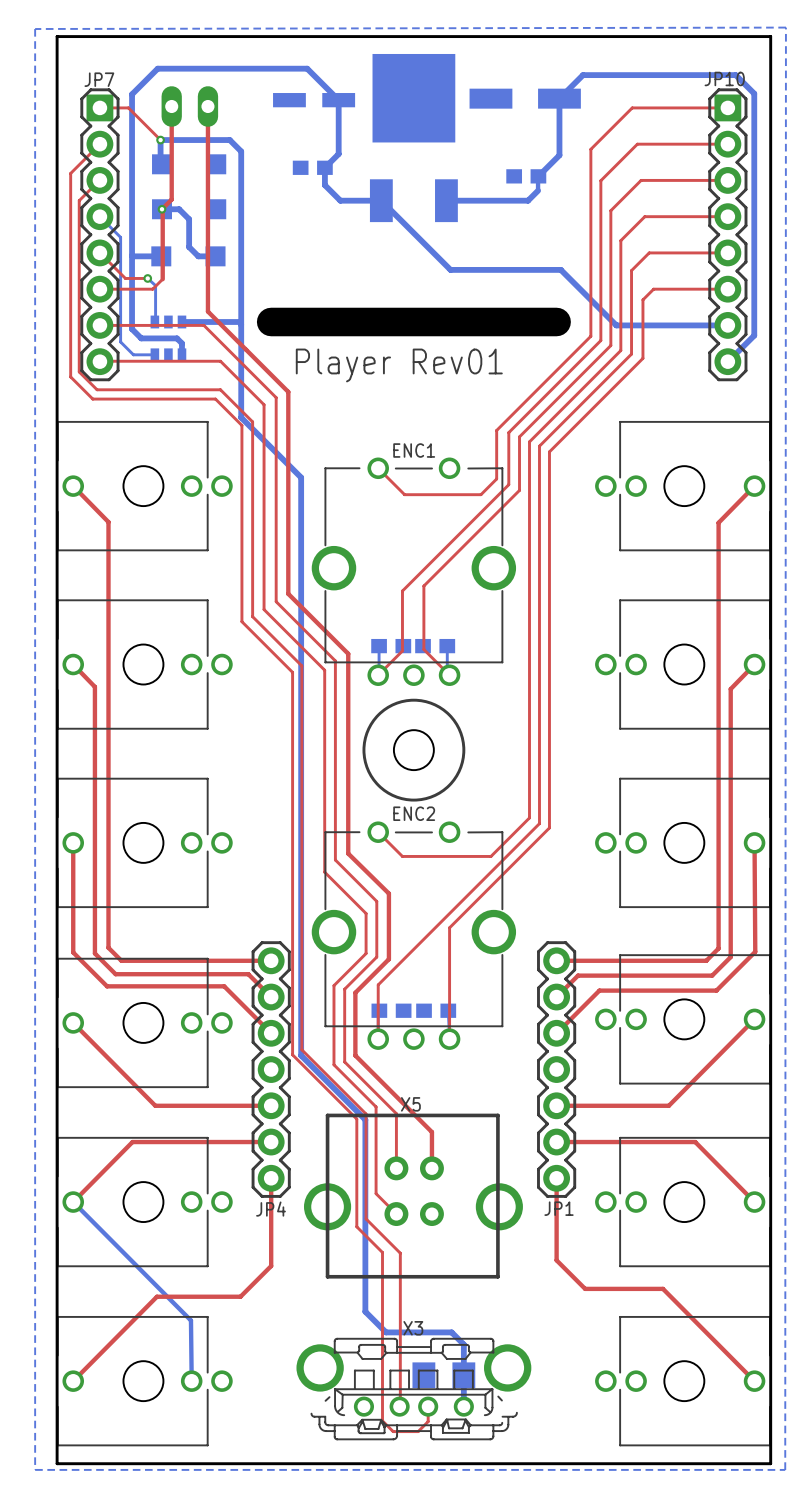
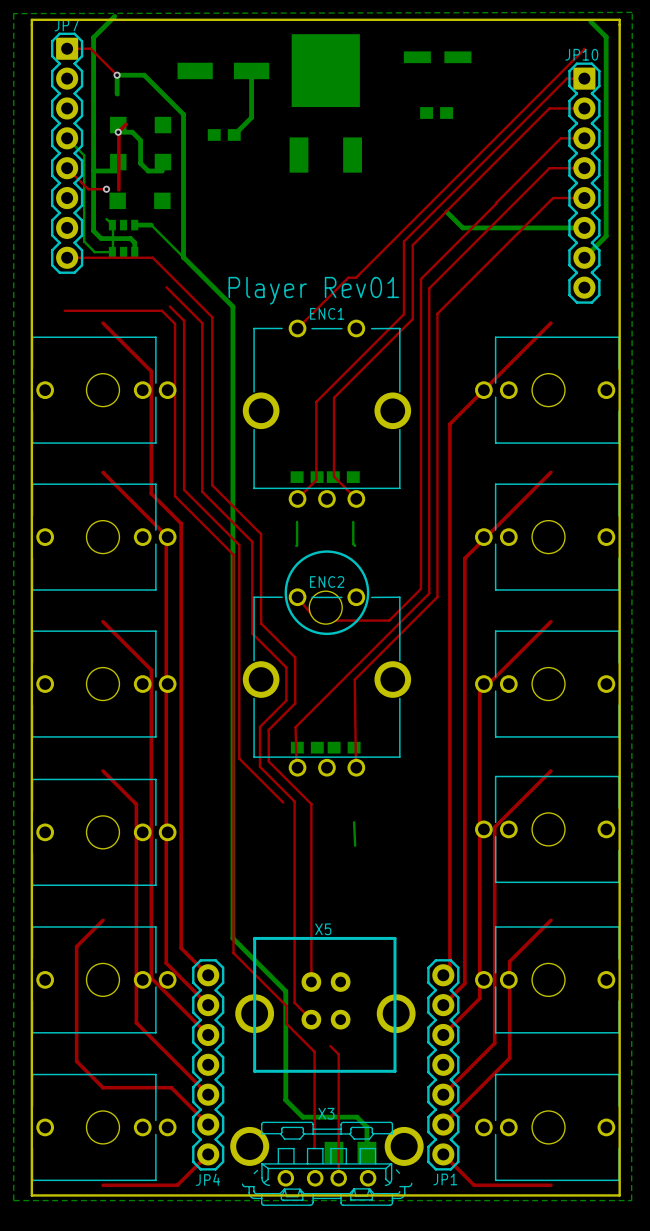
top track: none -> (584, 48) (355, 277) (348, 277) (297, 328)
bottom track: (754, 93) (735, 75) (583, 75) (559, 98) (559, 155) (538, 176) (538, 190) (528, 200) (446, 200) -> (606, 66) (606, 36) (590, 21)
bottom track: (132, 94) (157, 68) (307, 68) (338, 100) (338, 154) (324, 167) (324, 185) (340, 200) (381, 200) (450, 269) (560, 269) -> (93, 67) (93, 37) (114, 16)
bottom track: none -> (251, 70) (251, 117) (233, 135)
part position: (525, 98) -> (223, 70)
part position: (314, 100) -> (437, 57)
via: none -> (117, 75)
top track: (171, 106) (171, 199) (162, 209) -> (126, 124) (118, 132) (118, 162)
part: (189, 106) -> none
top track: (207, 106) (207, 311) (288, 391) (288, 593) (348, 653) (348, 853) (388, 893) (388, 959) (355, 992) (355, 1055) (431, 1132) (431, 1168) -> none
top track: (99, 107) (128, 107) (160, 140) -> (67, 48) (90, 48) (117, 75)
top track: (706, 107) (632, 107) (590, 149) (590, 336) (496, 430) (496, 478) (480, 494) (404, 494) (378, 468) -> (566, 78) (403, 241) (403, 314) (316, 401) (316, 476)
via: (160, 140) -> none
bottom track: (229, 140) (160, 140) (162, 164) -> (174, 105) (144, 75) (117, 75) (118, 95)
top track: (99, 144) (70, 173) (70, 376) (92, 399) (215, 399) (241, 425) -> (169, 306) (184, 320) (184, 340)
top track: (685, 144) (637, 144) (600, 180) (600, 340) (508, 432) (508, 484) (402, 591) -> (549, 108) (412, 245) (412, 319) (333, 397) (333, 472)
part position: (312, 167) -> (224, 134)
via: none -> (118, 132)
part position: (526, 176) -> (436, 112)
top track: (99, 180) (79, 200) (79, 371) (97, 389) -> none
top track: (699, 180) (641, 180) (610, 210) (610, 345) (519, 436) (519, 490) (423, 586) -> (560, 138) (496, 202)
bottom track: (162, 209) (179, 209) (189, 219) (189, 247) (198, 256) (215, 256) -> (118, 132) (132, 132) (140, 140) (140, 163) (148, 171) (162, 171)
via: (162, 209) -> none
bottom track: (99, 216) (120, 237) -> (67, 138) (84, 155) (84, 185)
top track: (685, 216) (644, 216) (620, 240) (620, 258) -> (549, 168) (519, 198)
JP7 position: (99, 234) -> (67, 153)
via: none -> (106, 189)
top track: (162, 242) (162, 279) (152, 289) (99, 289) -> none
top track: (99, 252) (125, 278) (147, 278) -> (67, 168) (88, 189) (106, 189)
top track: (649, 252) (689, 252) -> (523, 227) (553, 198)
bottom track: (132, 255) (161, 256) -> (93, 170) (117, 171)
top track: (620, 259) (620, 350) (529, 441) -> (496, 203) (420, 279) (420, 353)
top track: (631, 270) (631, 354) (539, 446) -> (505, 212) (429, 288) (429, 357)
via: (147, 278) -> none
bottom track: (580, 289) (616, 325) (727, 325) -> (462, 227) (584, 227)
top track: (653, 289) (727, 289) -> none
bottom track: (132, 292) (132, 329) (141, 338) (176, 338) (181, 343) (181, 354) -> (93, 230) (101, 238) (130, 238) (134, 242) (134, 252)
top track: (642, 299) (642, 358) (549, 451) -> (514, 236) (437, 313) (437, 361)
bottom track: (754, 299) (754, 335) (728, 361) -> (606, 236) (584, 257)
bottom track: (120, 305) (120, 341) (133, 354) (154, 354) -> (84, 241) (94, 252) (112, 252)
bottom track: (181, 322) (238, 322) -> (134, 225) (151, 225) (181, 254)
board edge: (271, 322) (556, 322) -> none
bottom track: (241, 324) (241, 417) (301, 477) -> (183, 257) (232, 306) (232, 383)
part position: (168, 338) -> (123, 238)
top track: (220, 361) (99, 361) -> none
top track: (215, 389) (220, 389) (252, 421) (252, 616) (301, 665) (301, 685) -> (161, 310) (175, 323) (175, 496) (233, 554)
top track: none -> (102, 323) (151, 371) (151, 493) (181, 523) (181, 948) (208, 975)
top track: none -> (550, 323) (449, 424) (449, 968) (443, 975)
top track: (72, 486) (108, 522) (108, 947) (121, 960) (271, 960) -> none
top track: (754, 486) (718, 522) (718, 948) (706, 960) (556, 960) -> none
ENC1 position: (413, 571) -> (326, 413)
top track: none -> (102, 472) (166, 535) (166, 963) (208, 1005)
top track: none -> (550, 472) (464, 558) (464, 983) (443, 1005)
part: none -> (307, 477)
top track: (423, 591) (423, 649) (449, 675) -> (333, 476) (356, 498)
part: none -> (343, 477)
top track: (402, 595) (402, 650) (378, 675) -> (316, 480) (297, 498)
top track: (241, 607) (241, 621) (292, 672) (292, 1054) (356, 1119) (356, 1226) (382, 1252) (382, 1420) (393, 1431) (418, 1431) (428, 1421) (428, 1406) -> (184, 489) (239, 545) (239, 758) (283, 802)
part: (391, 646) -> none
part: (435, 646) -> none
top track: (72, 664) (94, 686) (94, 953) (115, 974) (248, 974) (271, 997) -> none
top track: (754, 664) (730, 689) (730, 957) (712, 975) (578, 975) (556, 997) -> none
top track: (529, 727) (529, 817) (490, 856) (402, 856) (378, 832) -> (420, 588) (389, 620) (316, 620) (297, 597)
top track: (539, 733) (539, 823) (378, 984) (378, 1039) -> (429, 593) (295, 727) (297, 767)
top track: (549, 737) (549, 827) (449, 927) (449, 1039) -> (437, 597) (354, 679) (356, 767)
drawing position: (413, 750) -> (326, 592)
top track: none -> (102, 621) (151, 670) (151, 978) (208, 1034)
top track: none -> (550, 621) (479, 692) (479, 998) (443, 1034)
top track: (335, 769) (335, 860) (376, 901) (376, 957) (344, 989) (344, 1061) (396, 1113) -> (261, 623) (295, 657) (295, 703) (268, 729) (268, 761) (311, 804) (311, 907)
top track: (324, 781) (324, 872) (366, 913) (366, 953) (333, 985) (333, 1064) (376, 1106) -> (252, 633) (286, 667) (286, 700) (259, 726) (259, 766) (294, 801) (294, 901)
top track: (73, 842) (73, 952) (107, 986) (224, 986) (270, 1033) -> none
top track: (754, 842) (755, 951) (716, 990) (599, 990) (556, 1033) -> none
part: none -> (307, 747)
part: none -> (344, 747)
ENC2 position: (413, 935) -> (326, 682)
top track: none -> (102, 770) (136, 804) (136, 1022) (208, 1094)
top track: none -> (550, 770) (494, 827) (494, 1043) (443, 1094)
part: (391, 1010) -> none
part: (436, 1010) -> none
top track: (754, 1020) (668, 1105) (556, 1105) -> none
top track: (72, 1023) (155, 1105) (271, 1105) -> none
top track: (301, 1049) (366, 1114) (366, 1218) (400, 1253) (400, 1289) -> (233, 854) (233, 953) (286, 1005) (286, 1023) (314, 1051)
bottom track: (301, 1055) (365, 1119) (365, 1215) -> (232, 859) (232, 938) (285, 991)
JP4 position: (271, 1069) -> (208, 1064)
JP1 position: (556, 1069) -> (443, 1064)
top track: none -> (102, 920) (76, 946) (76, 1061) (102, 1087) (171, 1087) (208, 1124)
top track: none -> (550, 920) (509, 961) (509, 1058) (443, 1124)
top track: (271, 1142) (132, 1142) (72, 1201) -> none
top track: (556, 1142) (695, 1142) (755, 1201) -> none
top track: none -> (311, 952) (311, 982)
top track: (271, 1178) (271, 1266) (240, 1296) (156, 1296) (73, 1381) -> none
top track: (556, 1178) (556, 1260) (585, 1288) (663, 1288) (754, 1381) -> none
top track: (376, 1193) (396, 1214) -> (294, 973) (294, 1002) (311, 1019)
X5 position: (413, 1196) -> (325, 1004)
bottom track: (73, 1202) (190, 1320) (191, 1381) -> none
top track: none -> (330, 1046) (338, 1054) (338, 1178)
bottom track: (365, 1311) (386, 1332) (451, 1332) (463, 1344) (463, 1380) -> (285, 1070) (285, 1100) (302, 1117) (356, 1117) (366, 1127)
part position: (443, 1375) -> (350, 1152)
X3 position: (413, 1389) -> (326, 1163)
top track: none -> (208, 1154) (177, 1185) (102, 1185)
top track: none -> (443, 1154) (474, 1185) (550, 1185)

